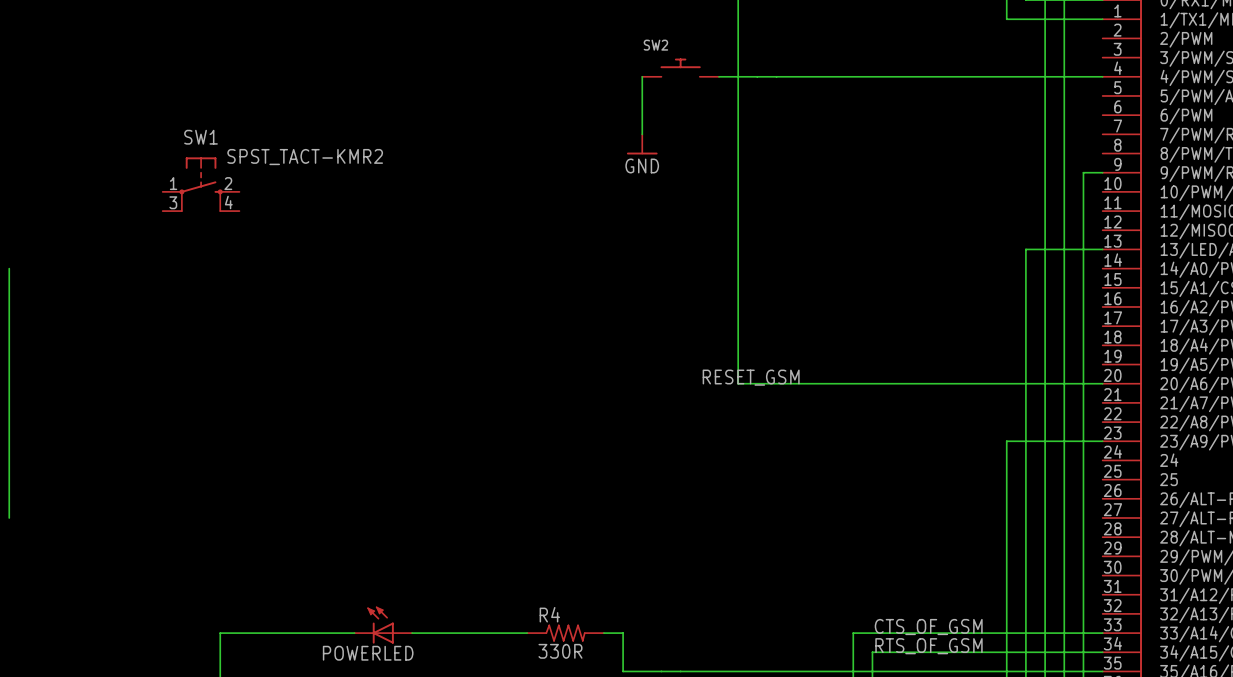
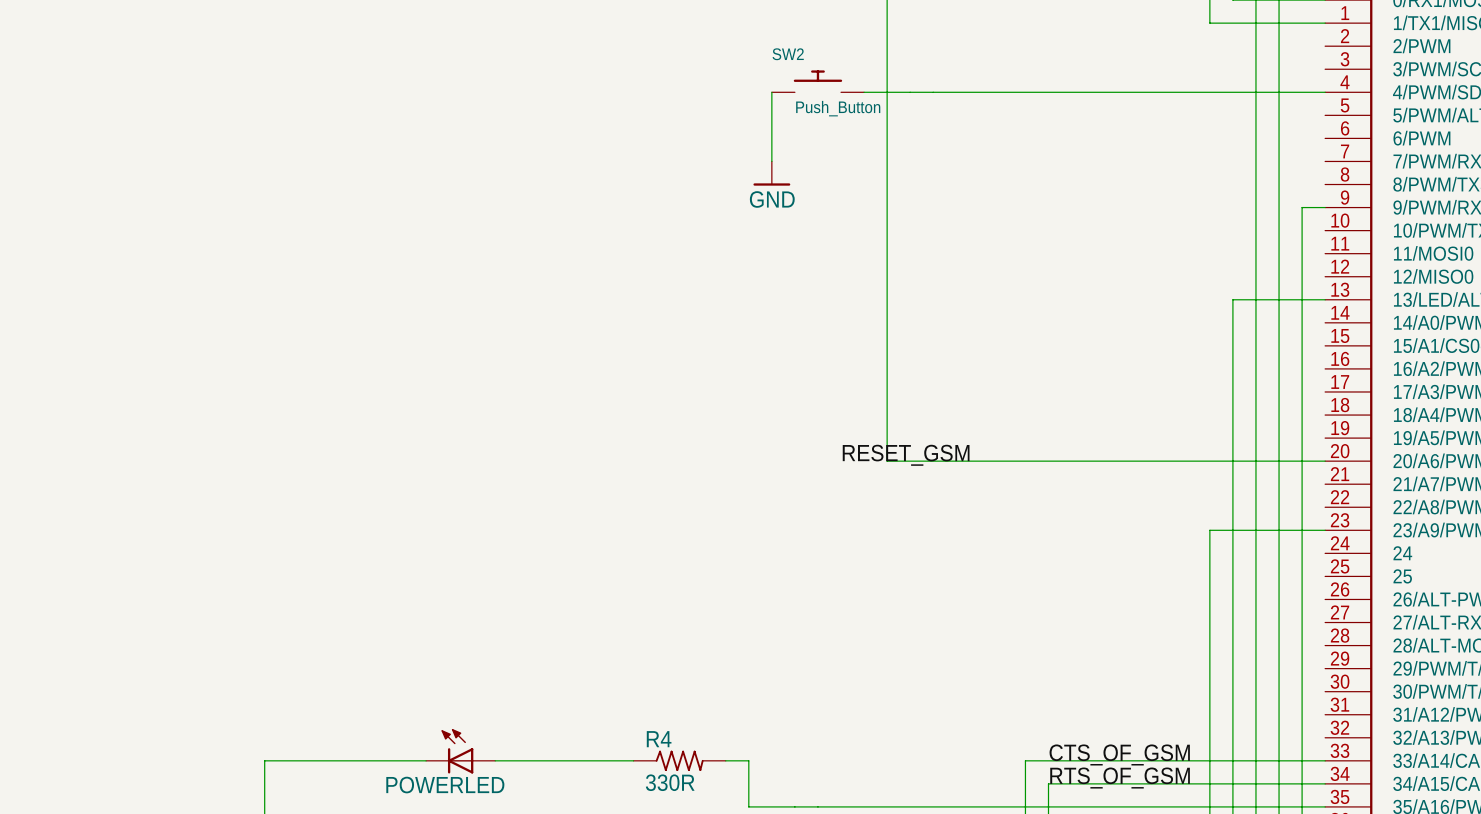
SW2 value: none -> Push_Button (838, 108)
SW1: SPST_TACT-KMR2 (201, 184) -> none
wire: (9, 268) (9, 518) -> none

